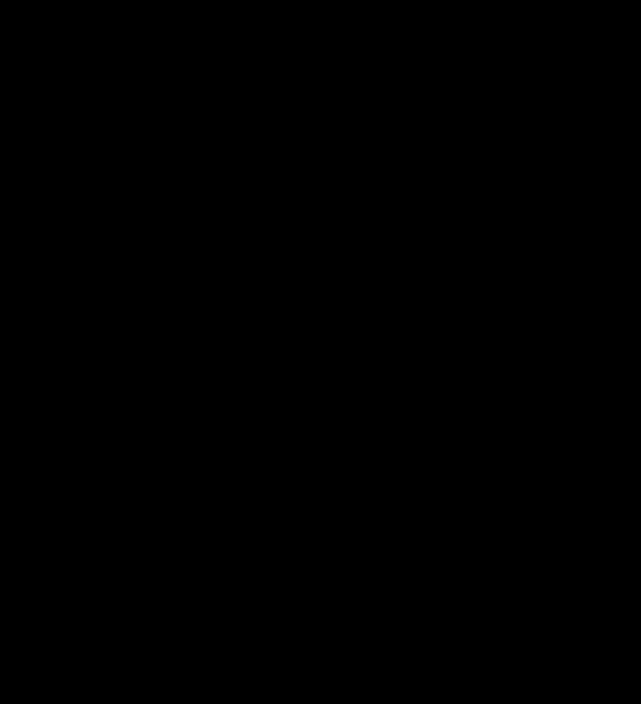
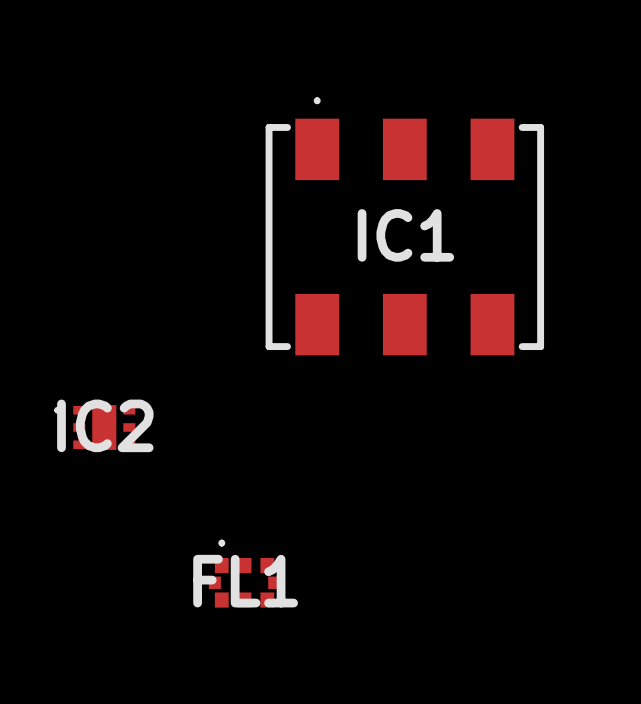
IC1: none -> (404, 226)
IC2: none -> (94, 427)
FL1: none -> (244, 573)

